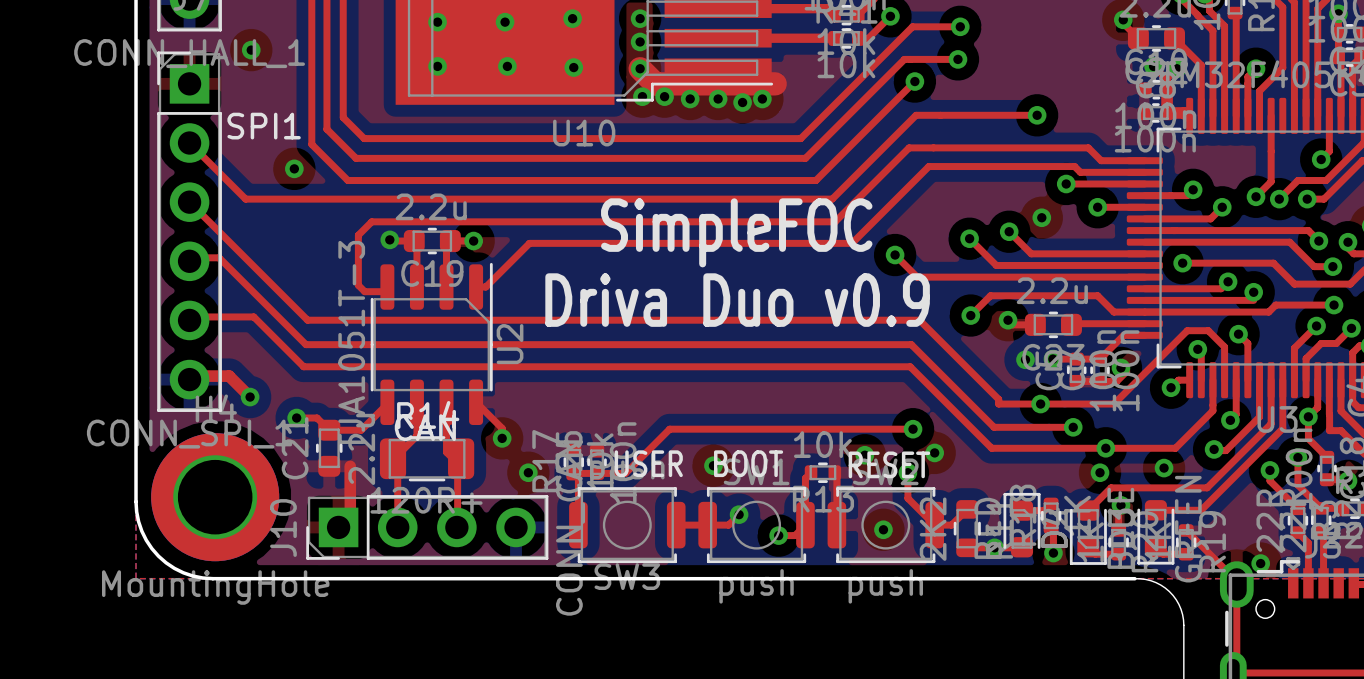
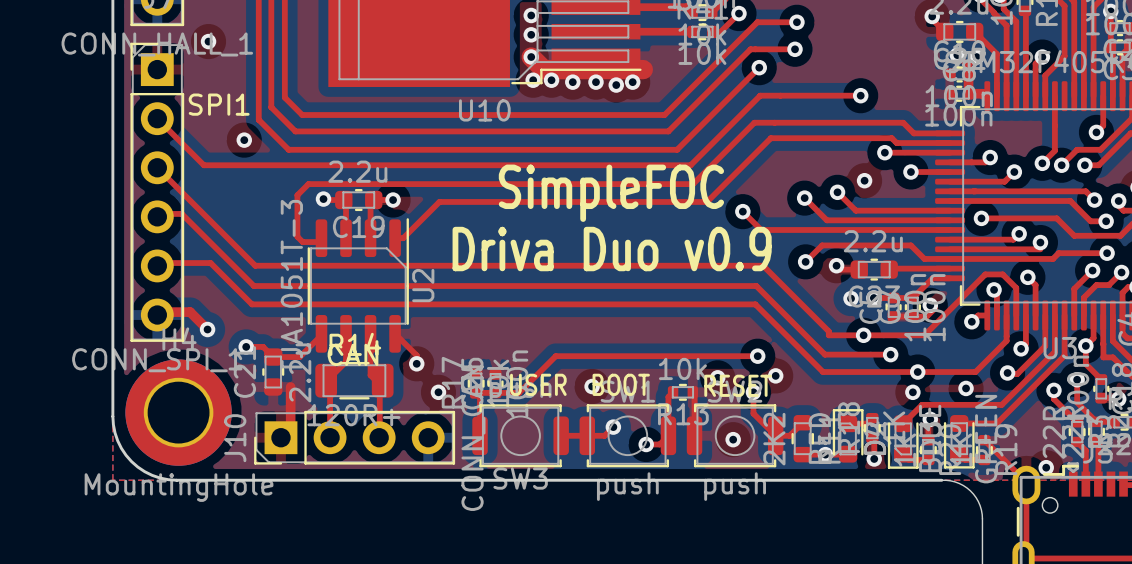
via: (572, 18) -> none
via: (437, 22) -> none
via: (505, 22) -> none
via: (437, 66) -> none
via: (507, 66) -> none
via: (573, 67) -> none

